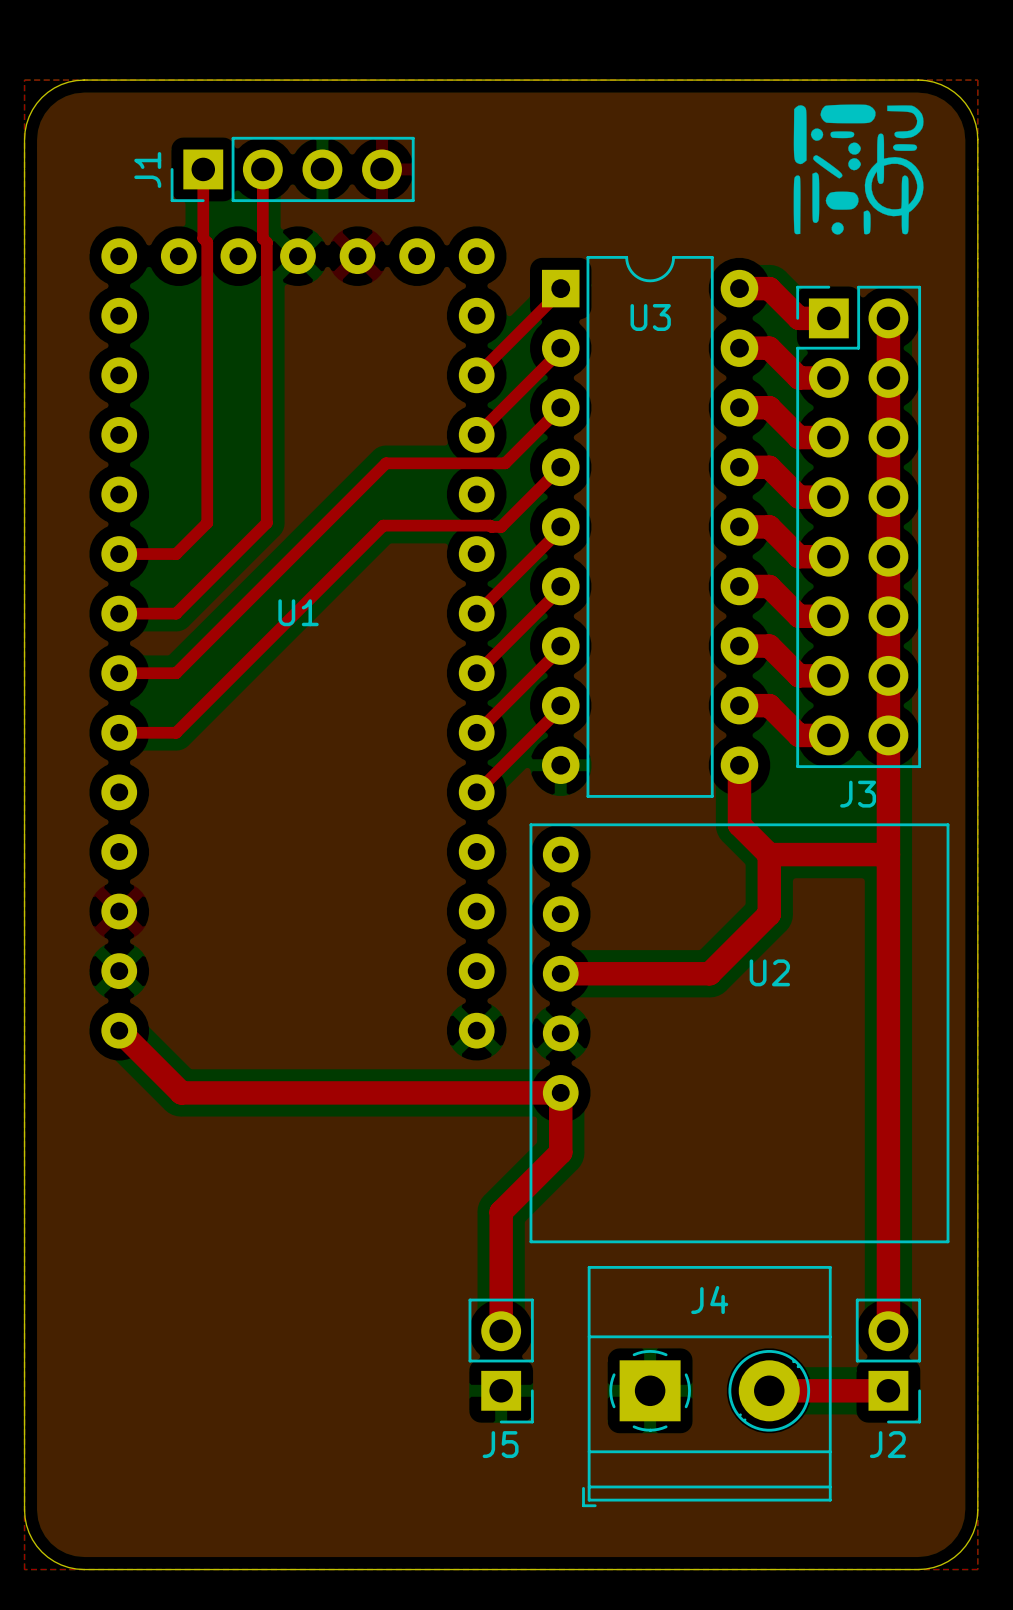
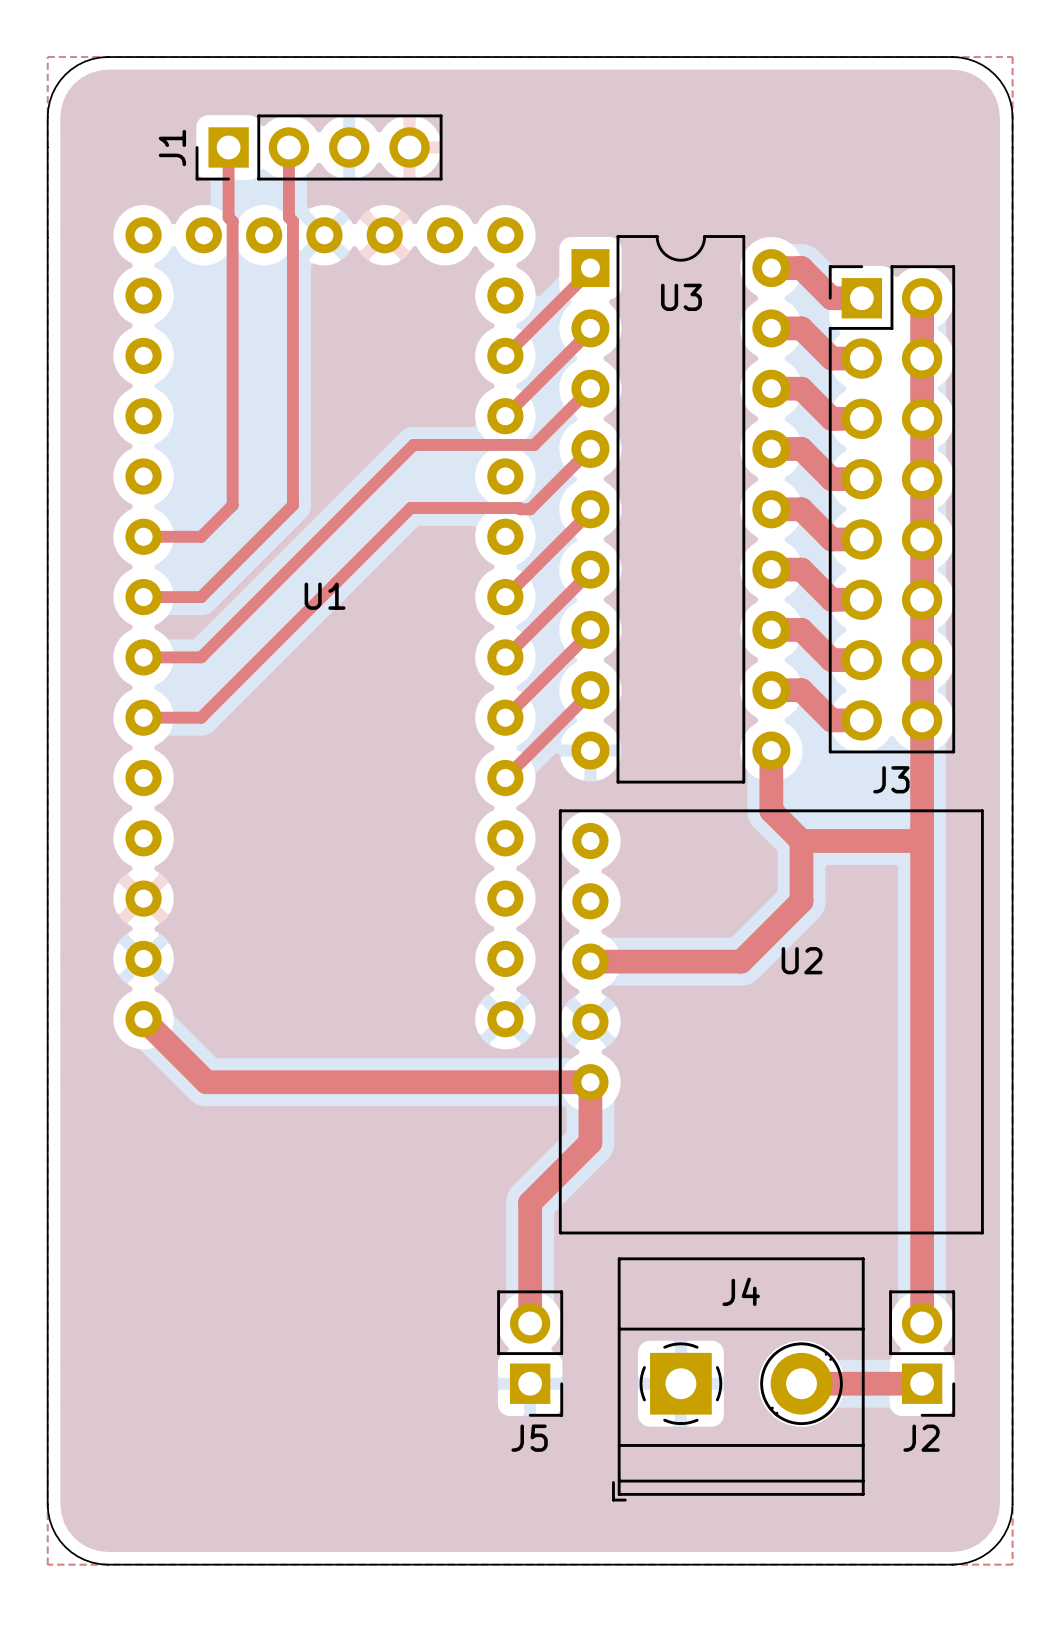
drawing: [793, 104, 924, 235] -> none

